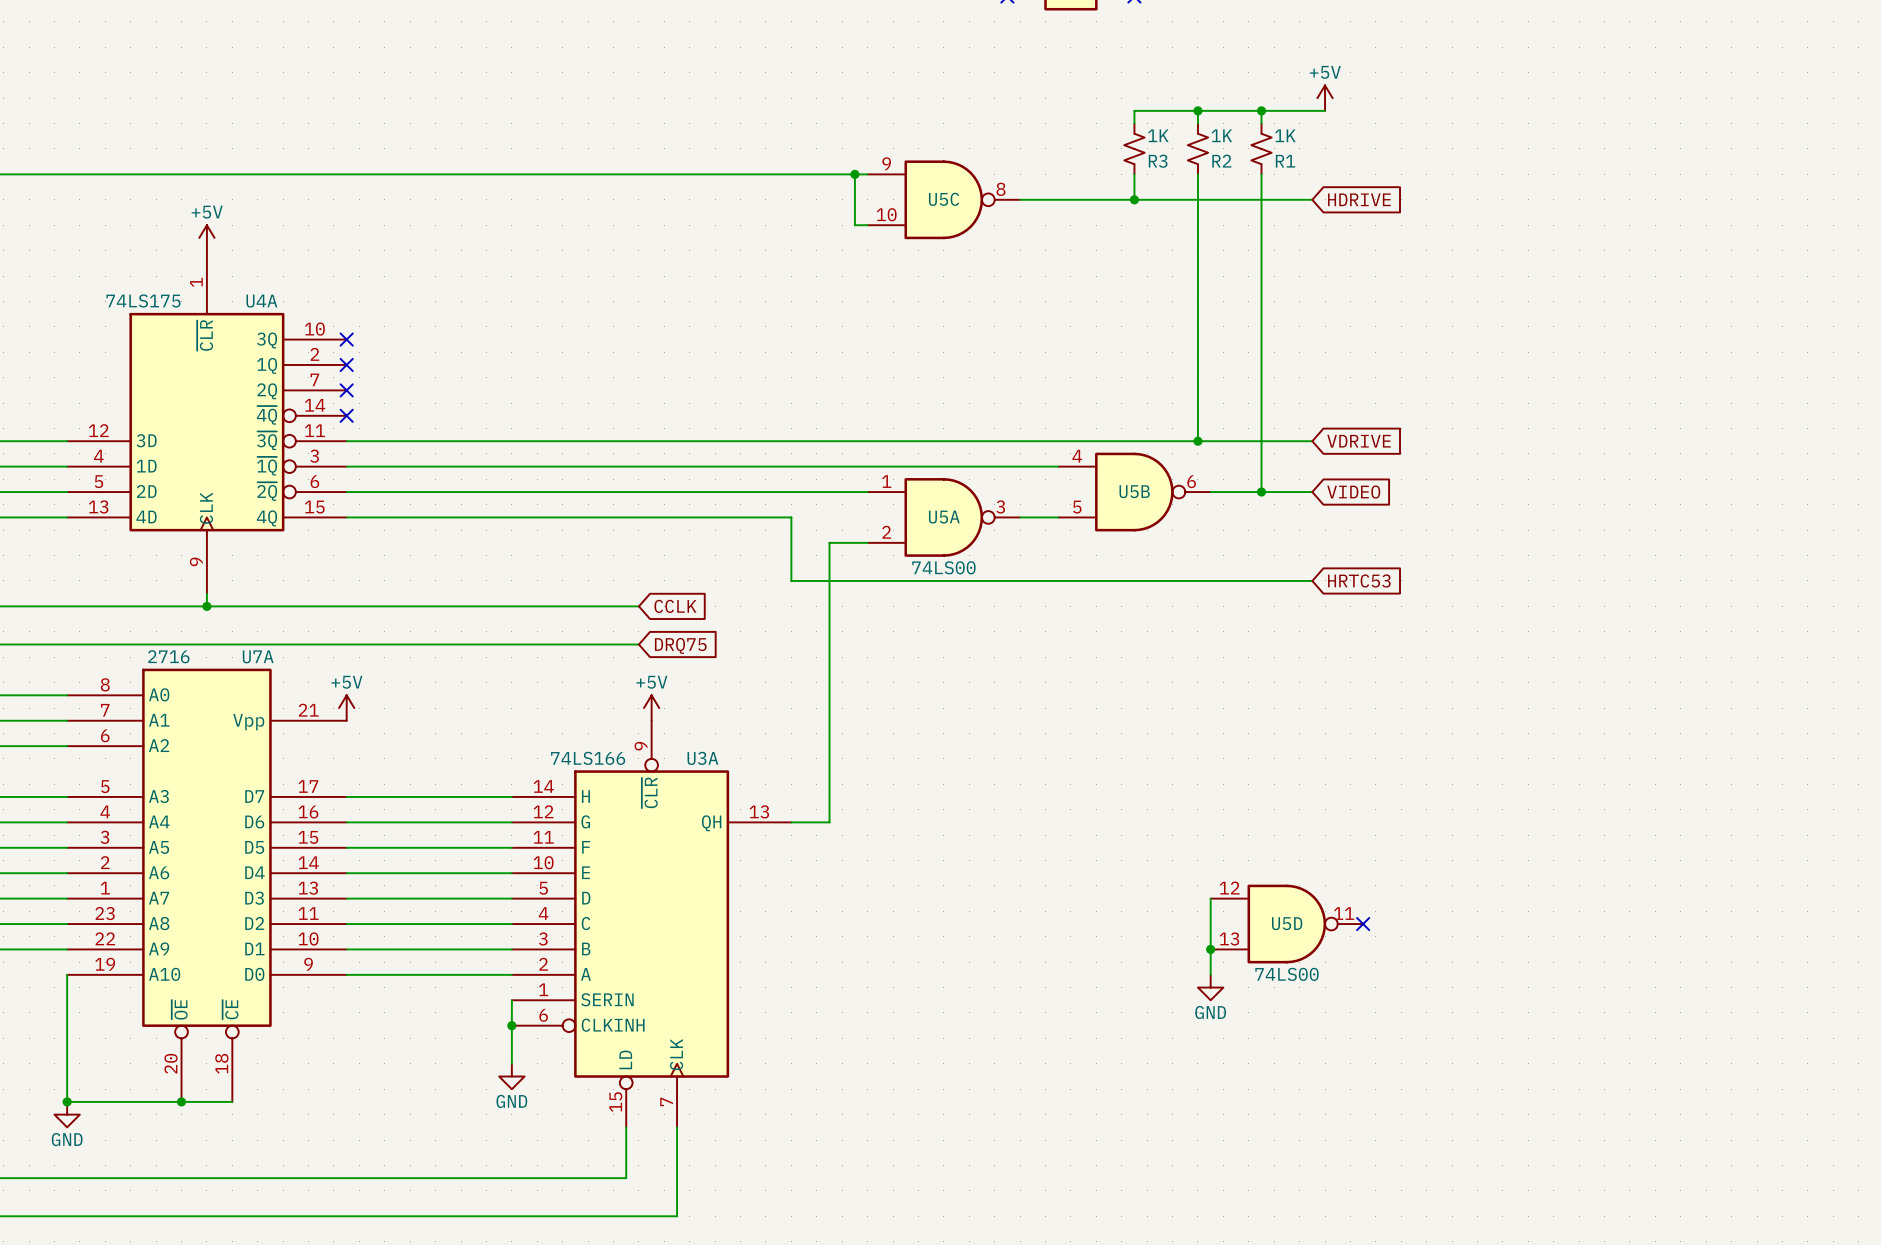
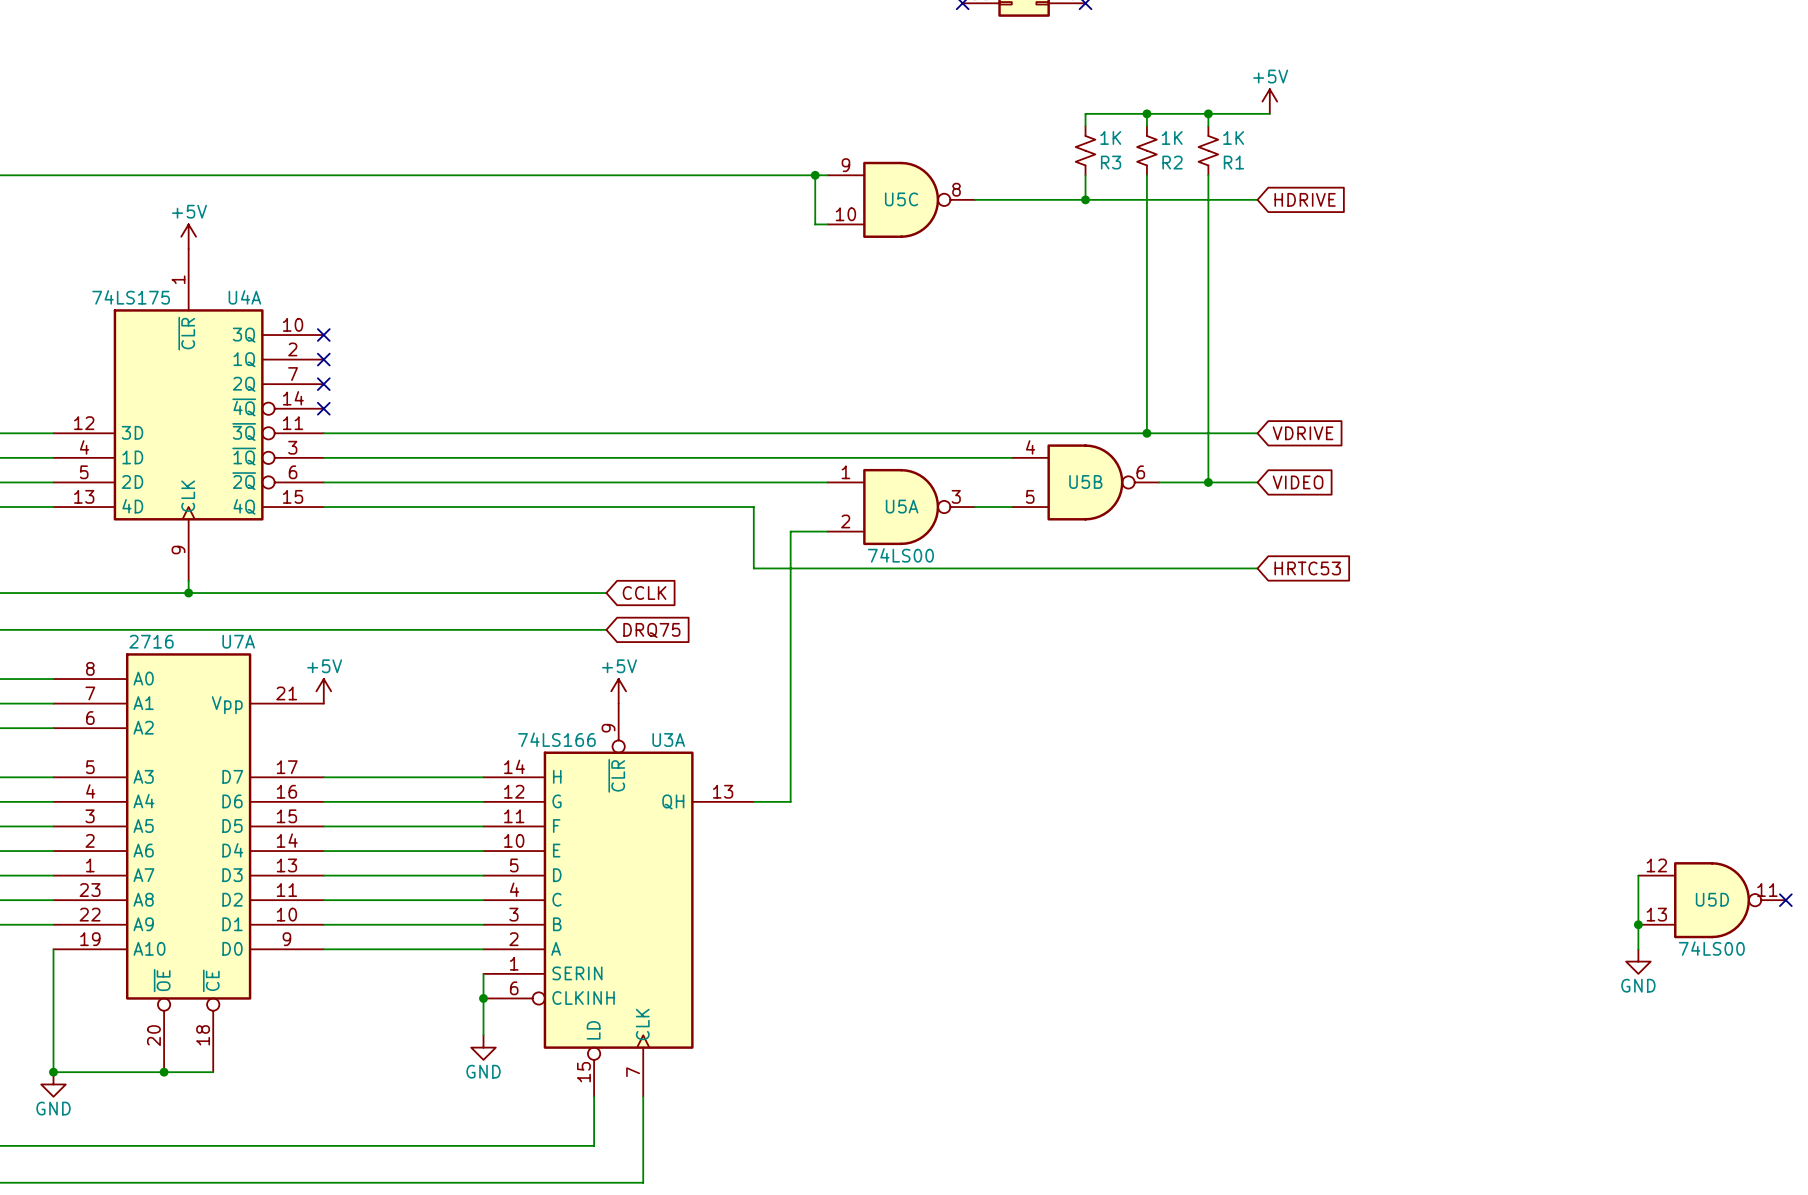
wire: (1210, 898) (1210, 974) -> none
wire: none -> (1638, 875) (1638, 949)
U5D position: (1286, 924) -> (1712, 900)
no-connect mark: (1363, 924) -> none
no-connect mark: none -> (1785, 900)
junction: (1210, 949) -> none
junction: none -> (1638, 924)
power symbol: GND (1210, 987) -> none
power symbol: none -> GND (1638, 961)

